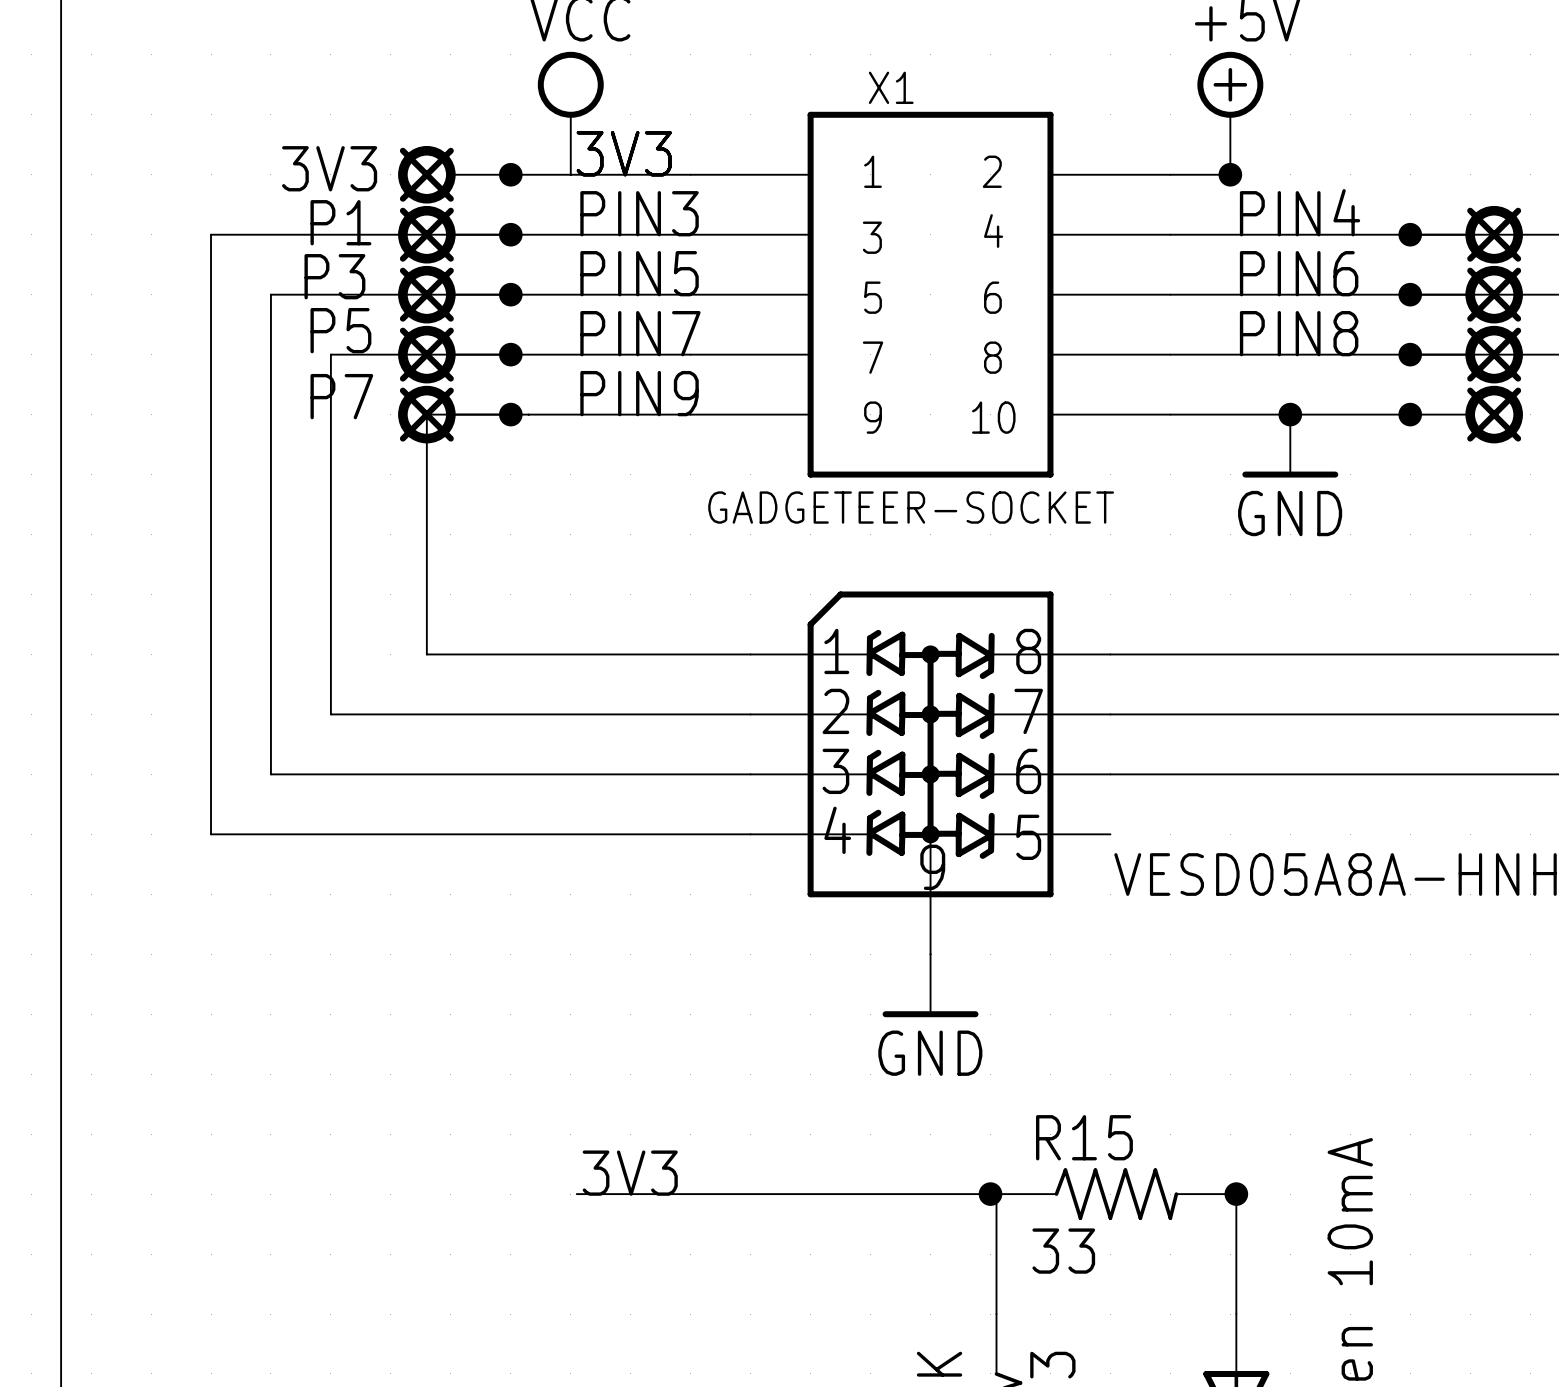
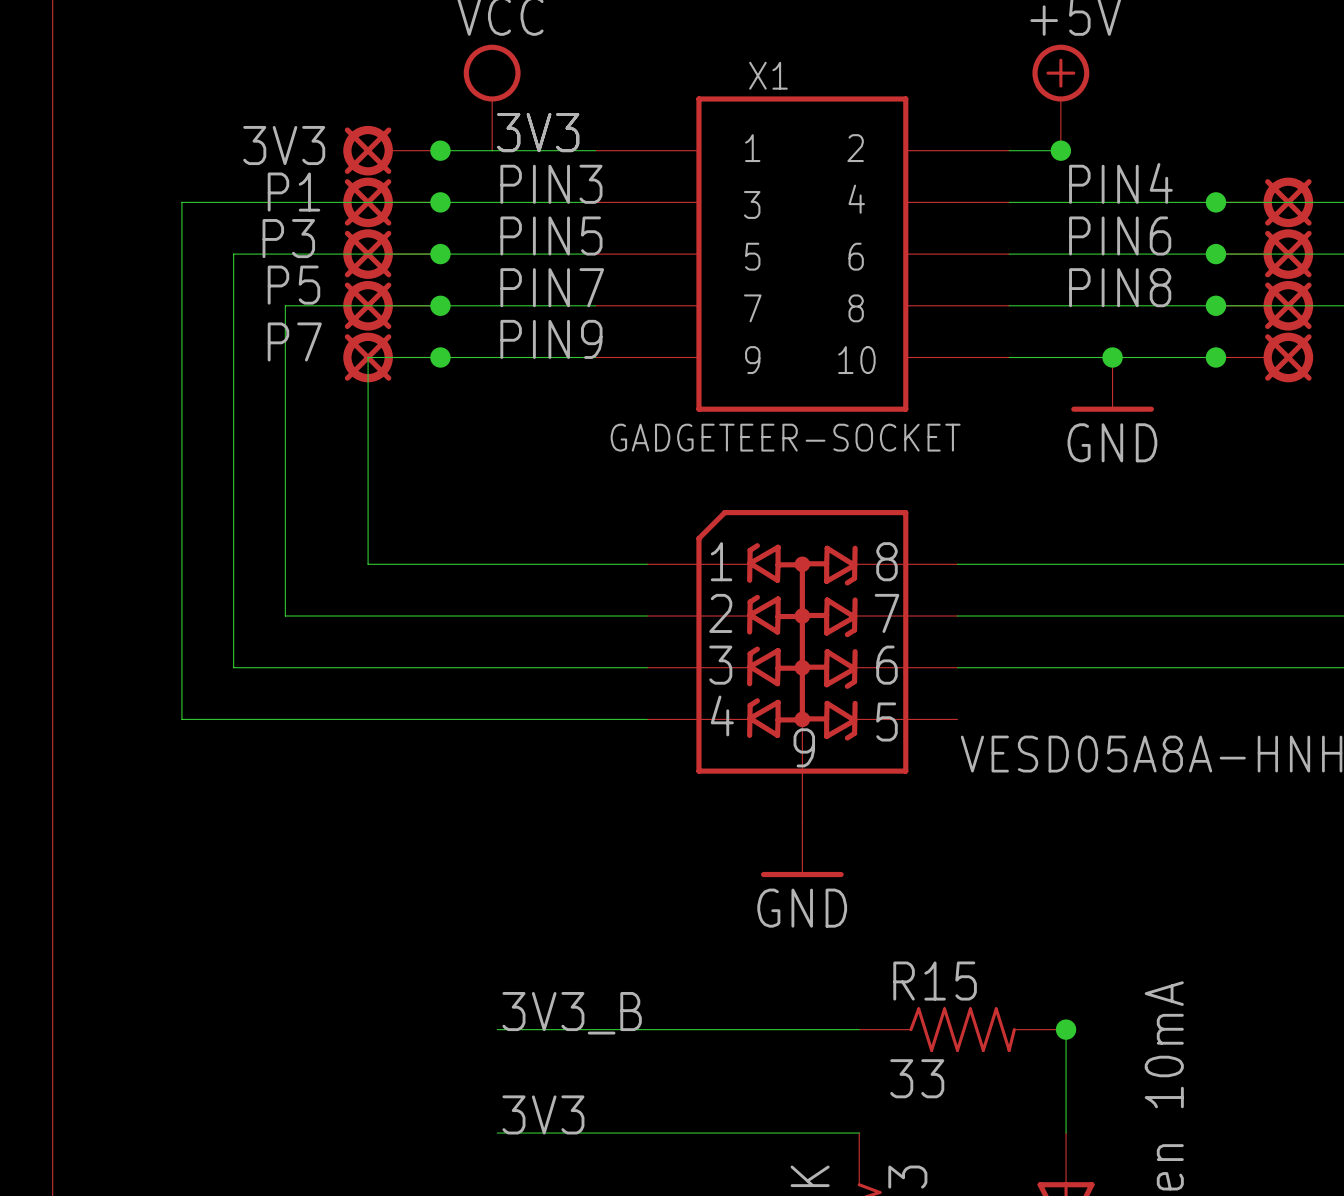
label: 3V3 (630, 1173) -> 3V3_B (572, 1013)
junction: (990, 1194) -> none
wire: (996, 1194) (996, 1314) -> (497, 1133) (859, 1133)
label: none -> 3V3 (543, 1114)

